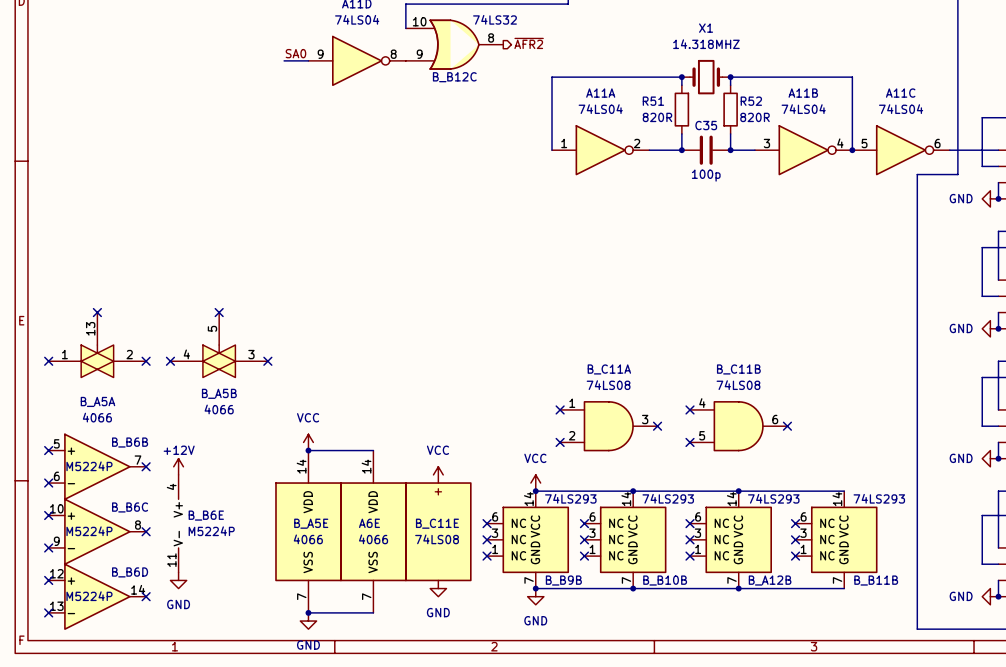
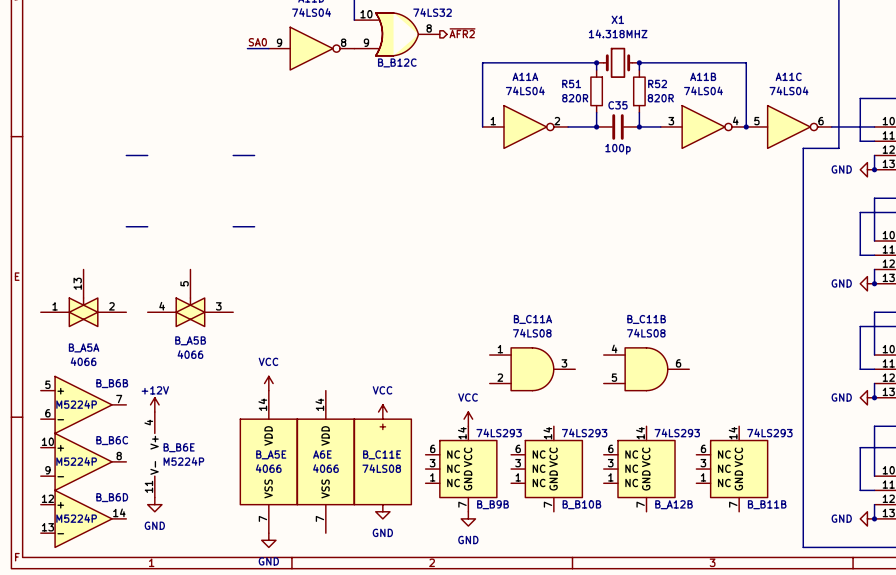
wire: none -> (126, 155) (147, 155)
wire: none -> (233, 155) (254, 155)
wire: none -> (126, 226) (147, 226)
wire: none -> (233, 226) (254, 226)
no-connect mark: (97, 312) -> none
no-connect mark: (219, 312) -> none
no-connect mark: (48, 361) -> none
no-connect mark: (146, 361) -> none
no-connect mark: (170, 361) -> none
no-connect mark: (267, 361) -> none
no-connect mark: (560, 409) -> none
no-connect mark: (690, 409) -> none
no-connect mark: (657, 426) -> none
no-connect mark: (787, 426) -> none
no-connect mark: (560, 442) -> none
no-connect mark: (690, 442) -> none
no-connect mark: (48, 450) -> none
wire: (308, 450) (373, 450) -> none
junction: (308, 450) -> none
no-connect mark: (146, 466) -> none
no-connect mark: (48, 483) -> none
wire: (535, 491) (844, 491) -> none
junction: (535, 491) -> none
junction: (633, 491) -> none
junction: (738, 491) -> none
no-connect mark: (48, 515) -> none
no-connect mark: (487, 523) -> none
no-connect mark: (584, 523) -> none
no-connect mark: (690, 523) -> none
no-connect mark: (795, 523) -> none
no-connect mark: (146, 531) -> none
no-connect mark: (487, 539) -> none
no-connect mark: (584, 539) -> none
no-connect mark: (690, 539) -> none
no-connect mark: (795, 539) -> none
no-connect mark: (48, 547) -> none
no-connect mark: (487, 556) -> none
no-connect mark: (584, 556) -> none
no-connect mark: (690, 556) -> none
no-connect mark: (795, 556) -> none
no-connect mark: (48, 580) -> none
wire: (535, 588) (844, 588) -> none
junction: (535, 588) -> none
junction: (633, 588) -> none
junction: (738, 588) -> none
no-connect mark: (146, 596) -> none
no-connect mark: (48, 612) -> none
wire: (308, 612) (373, 612) -> none
junction: (308, 612) -> none

